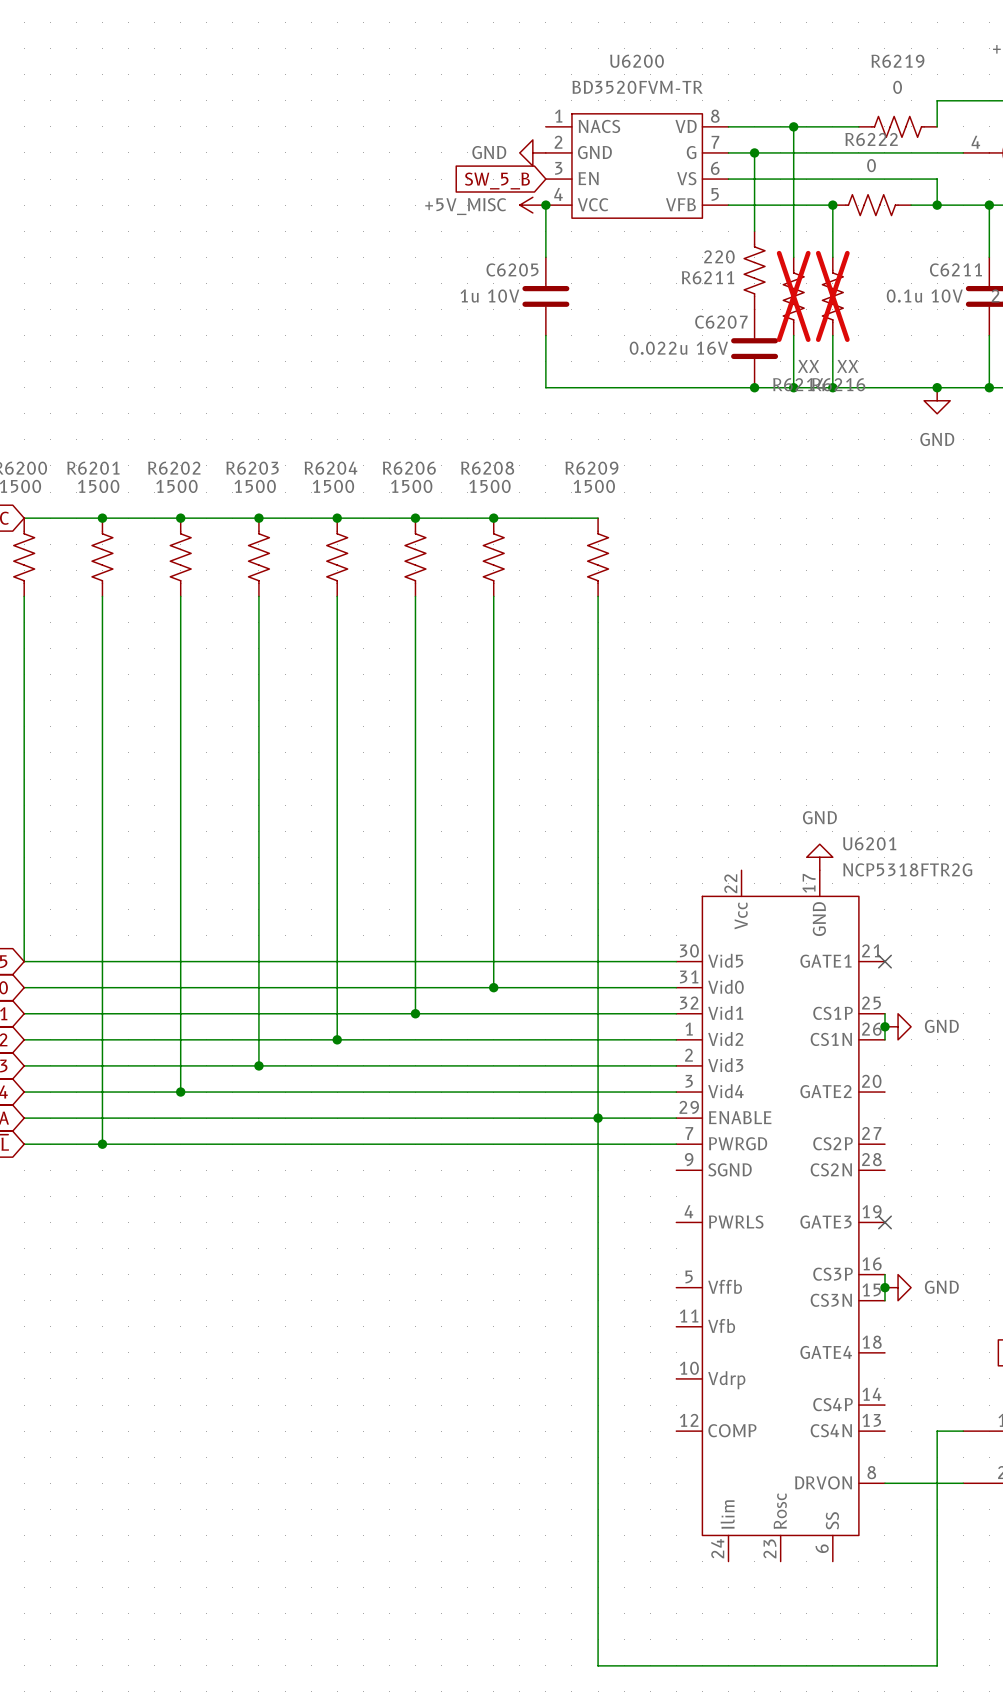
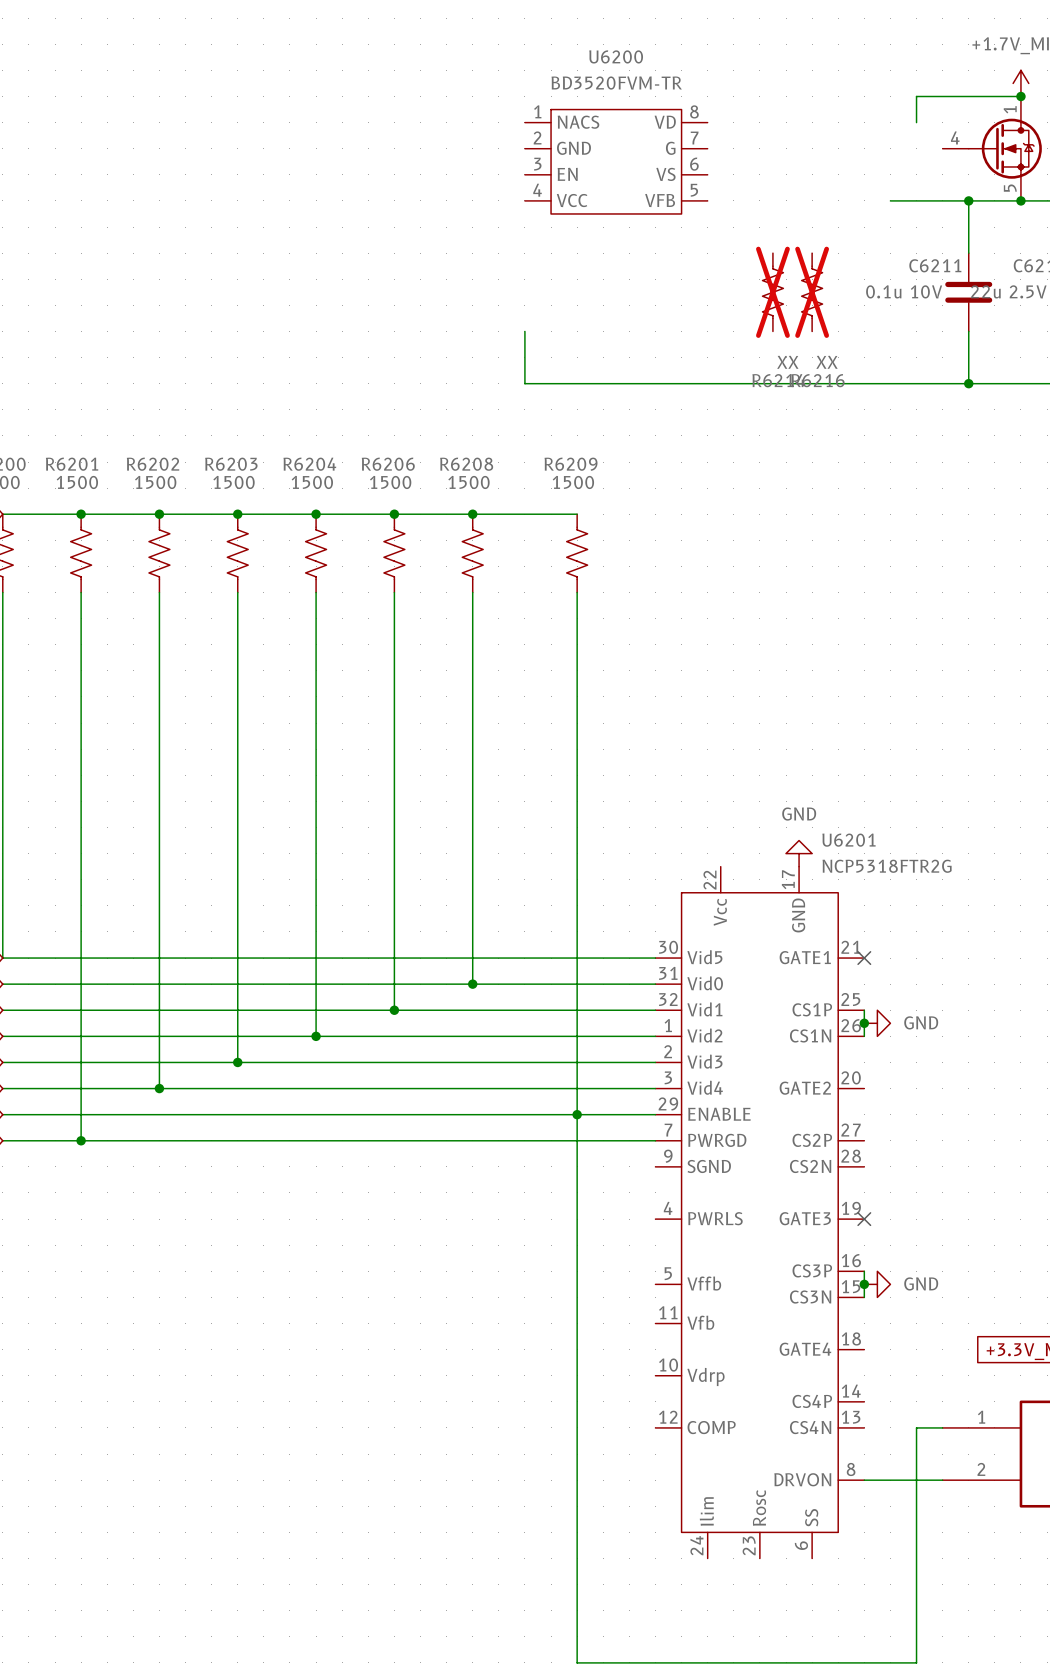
wire: (728, 126) (858, 126) -> none
wire: (793, 126) (793, 257) -> none
junction: (793, 126) -> none
R6219: 0 (898, 126) -> none
power symbol: GND (532, 152) -> none
wire: (728, 152) (963, 152) -> none
wire: (754, 152) (754, 231) -> none
junction: (754, 152) -> none
wire: (728, 179) (937, 179) (937, 205) -> none
global label: SW_5_B (497, 181) -> none
power symbol: +5V_MISC (532, 205) -> none
wire: (545, 205) (545, 257) -> none
junction: (545, 205) -> none
wire: (728, 205) (832, 205) (832, 257) -> none
junction: (832, 205) -> none
R6222: 0 (871, 205) -> none
junction: (937, 205) -> none
R6211: 220 (754, 270) -> none
C6205: 1u 10V (545, 296) -> none
wire: (793, 335) (793, 387) -> none
wire: (832, 335) (832, 387) -> none
C6207: 0.022u 16V (754, 348) -> none
junction: (754, 387) -> none
junction: (793, 387) -> none
junction: (832, 387) -> none
junction: (937, 387) -> none
power symbol: GND (937, 400) -> none

